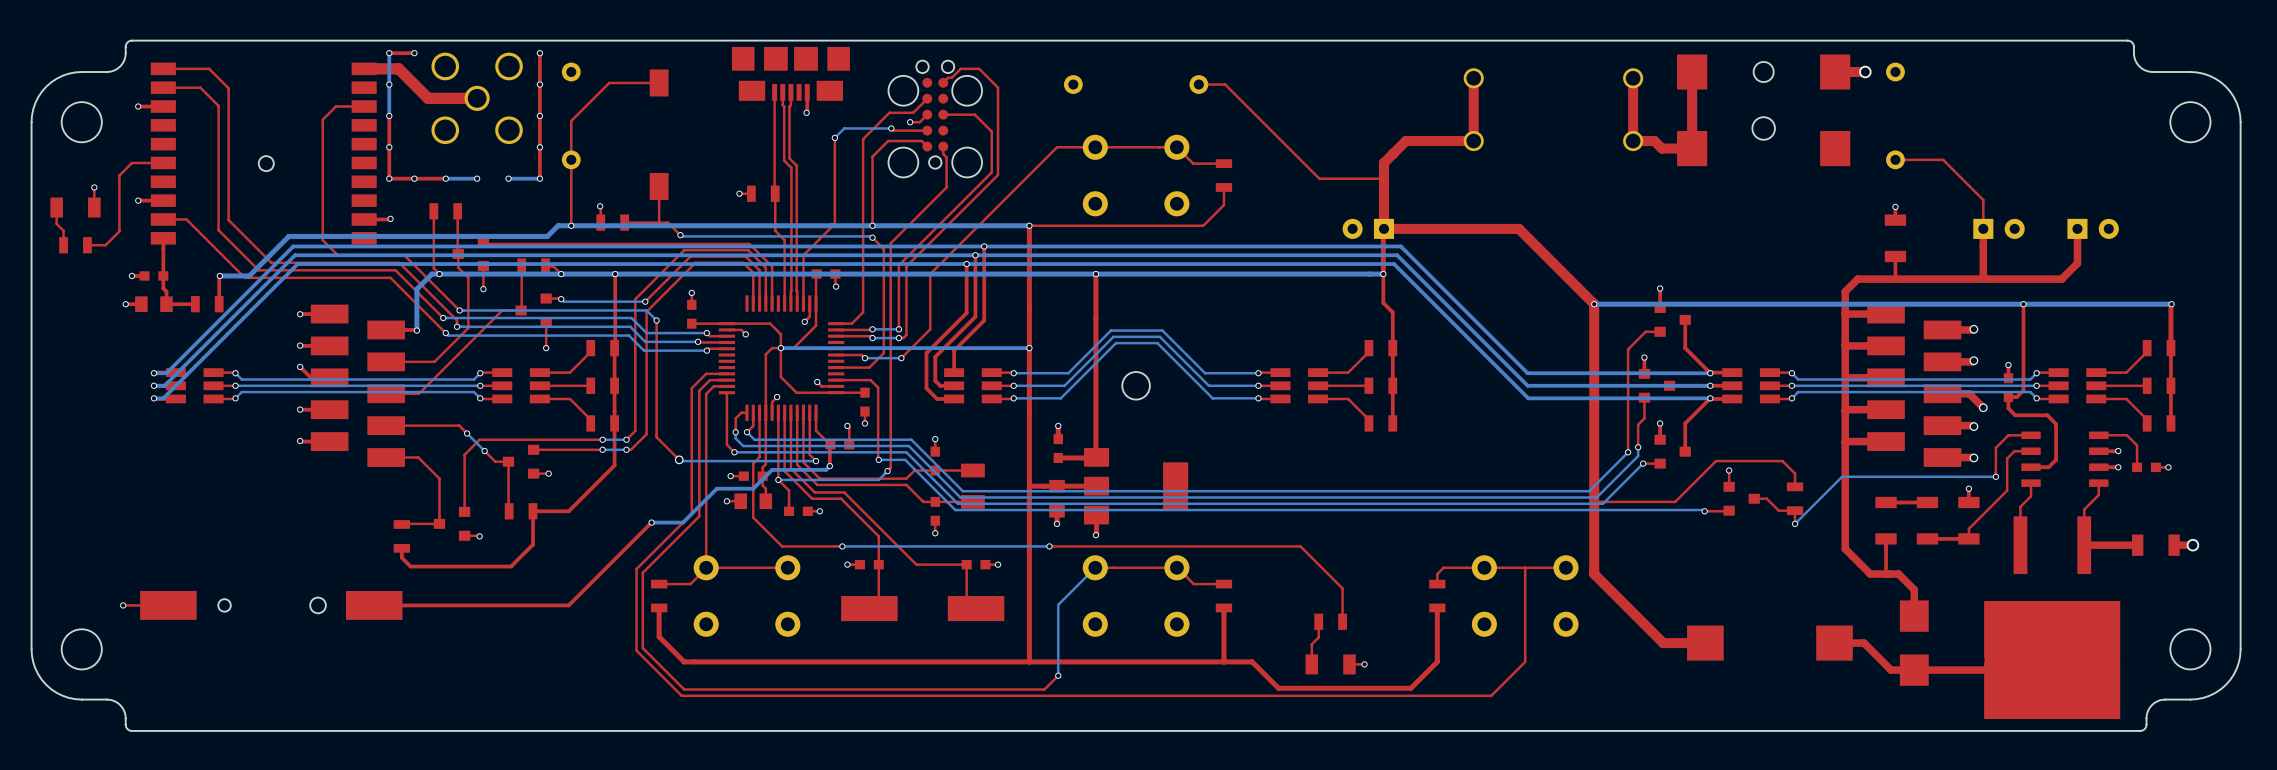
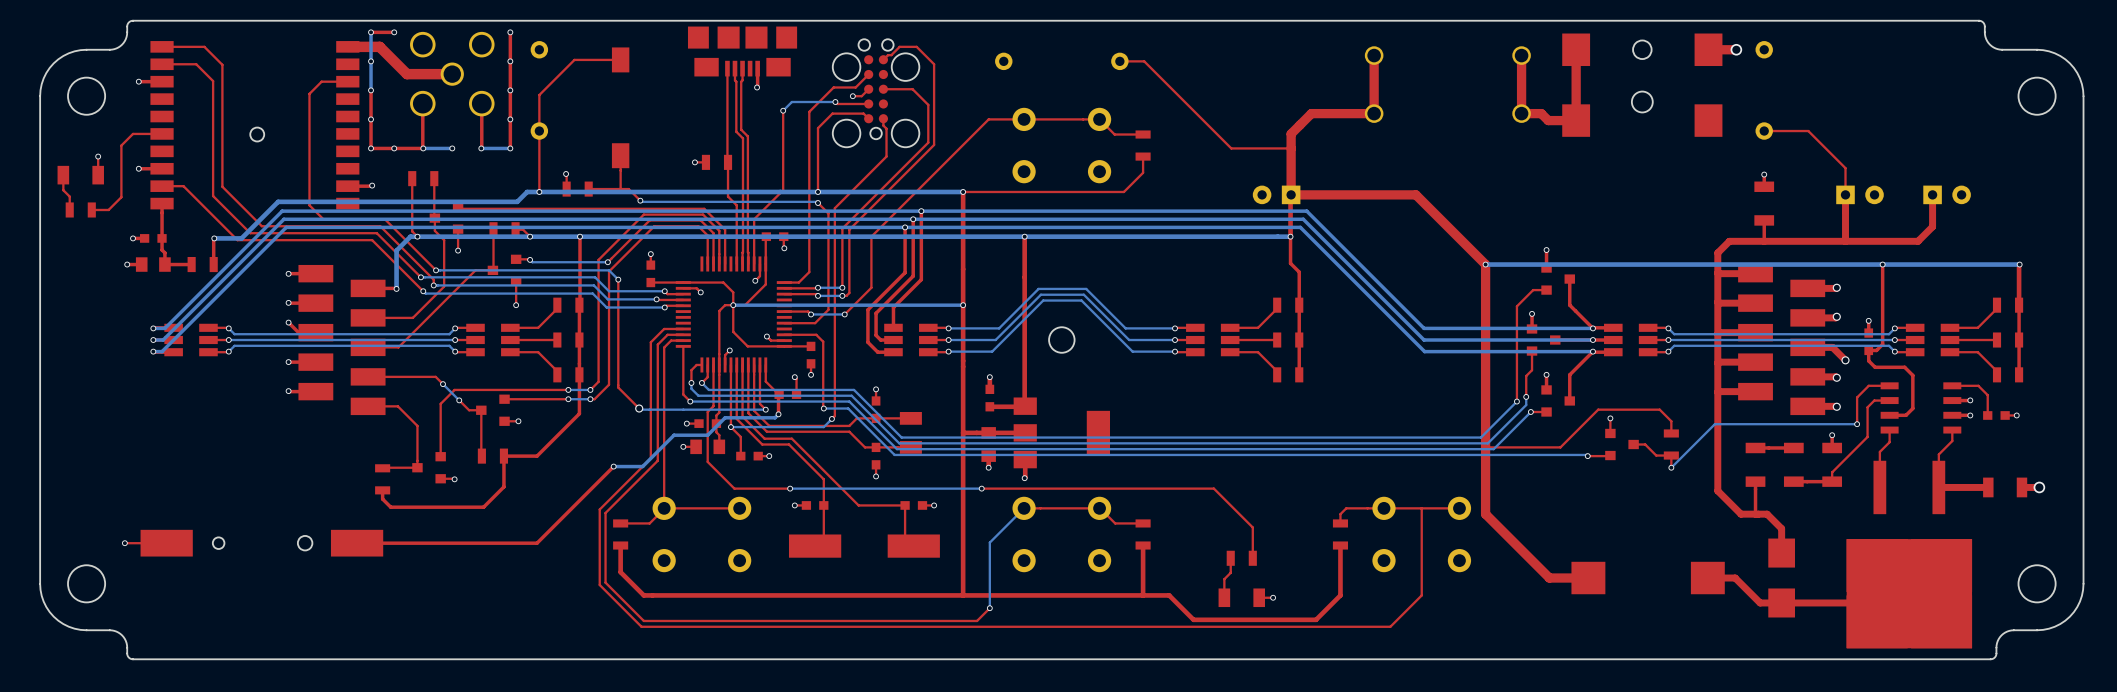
top track: none -> (422, 103) (422, 147)
top track: none -> (481, 103) (481, 147)

